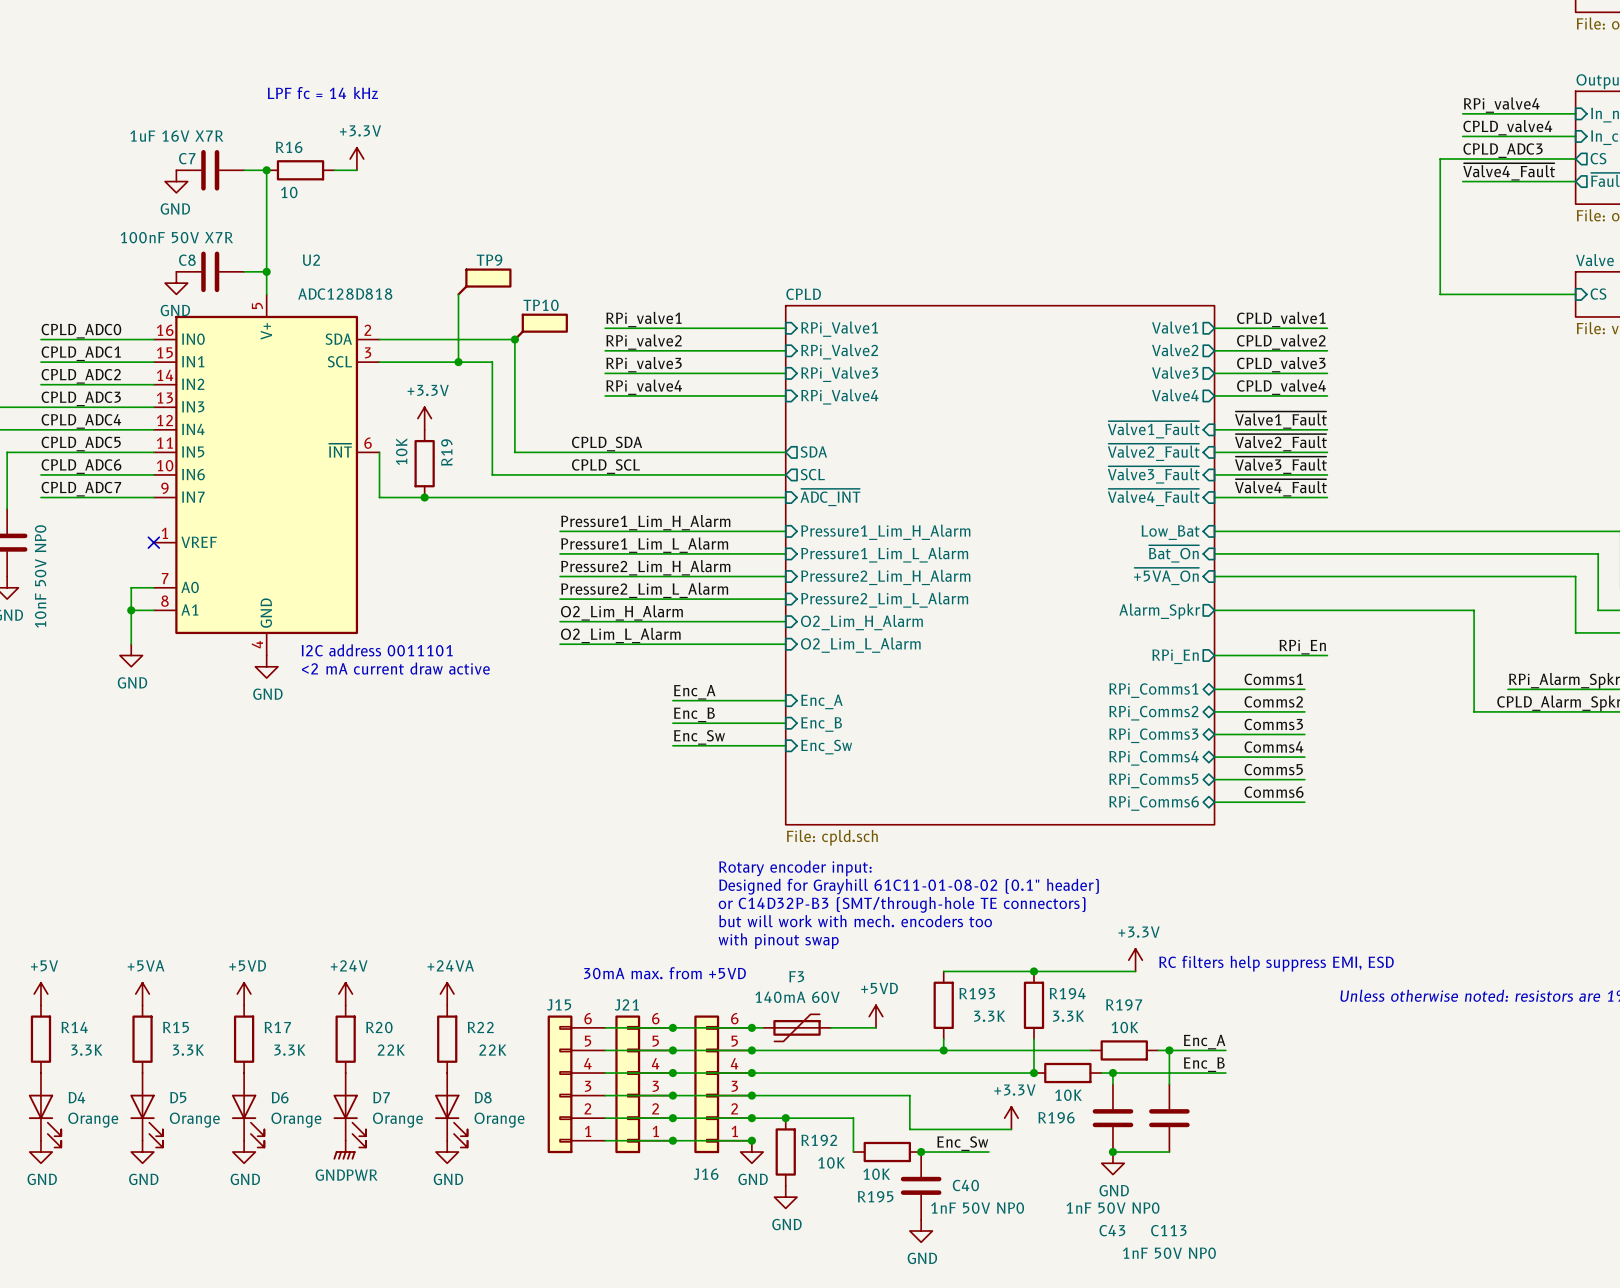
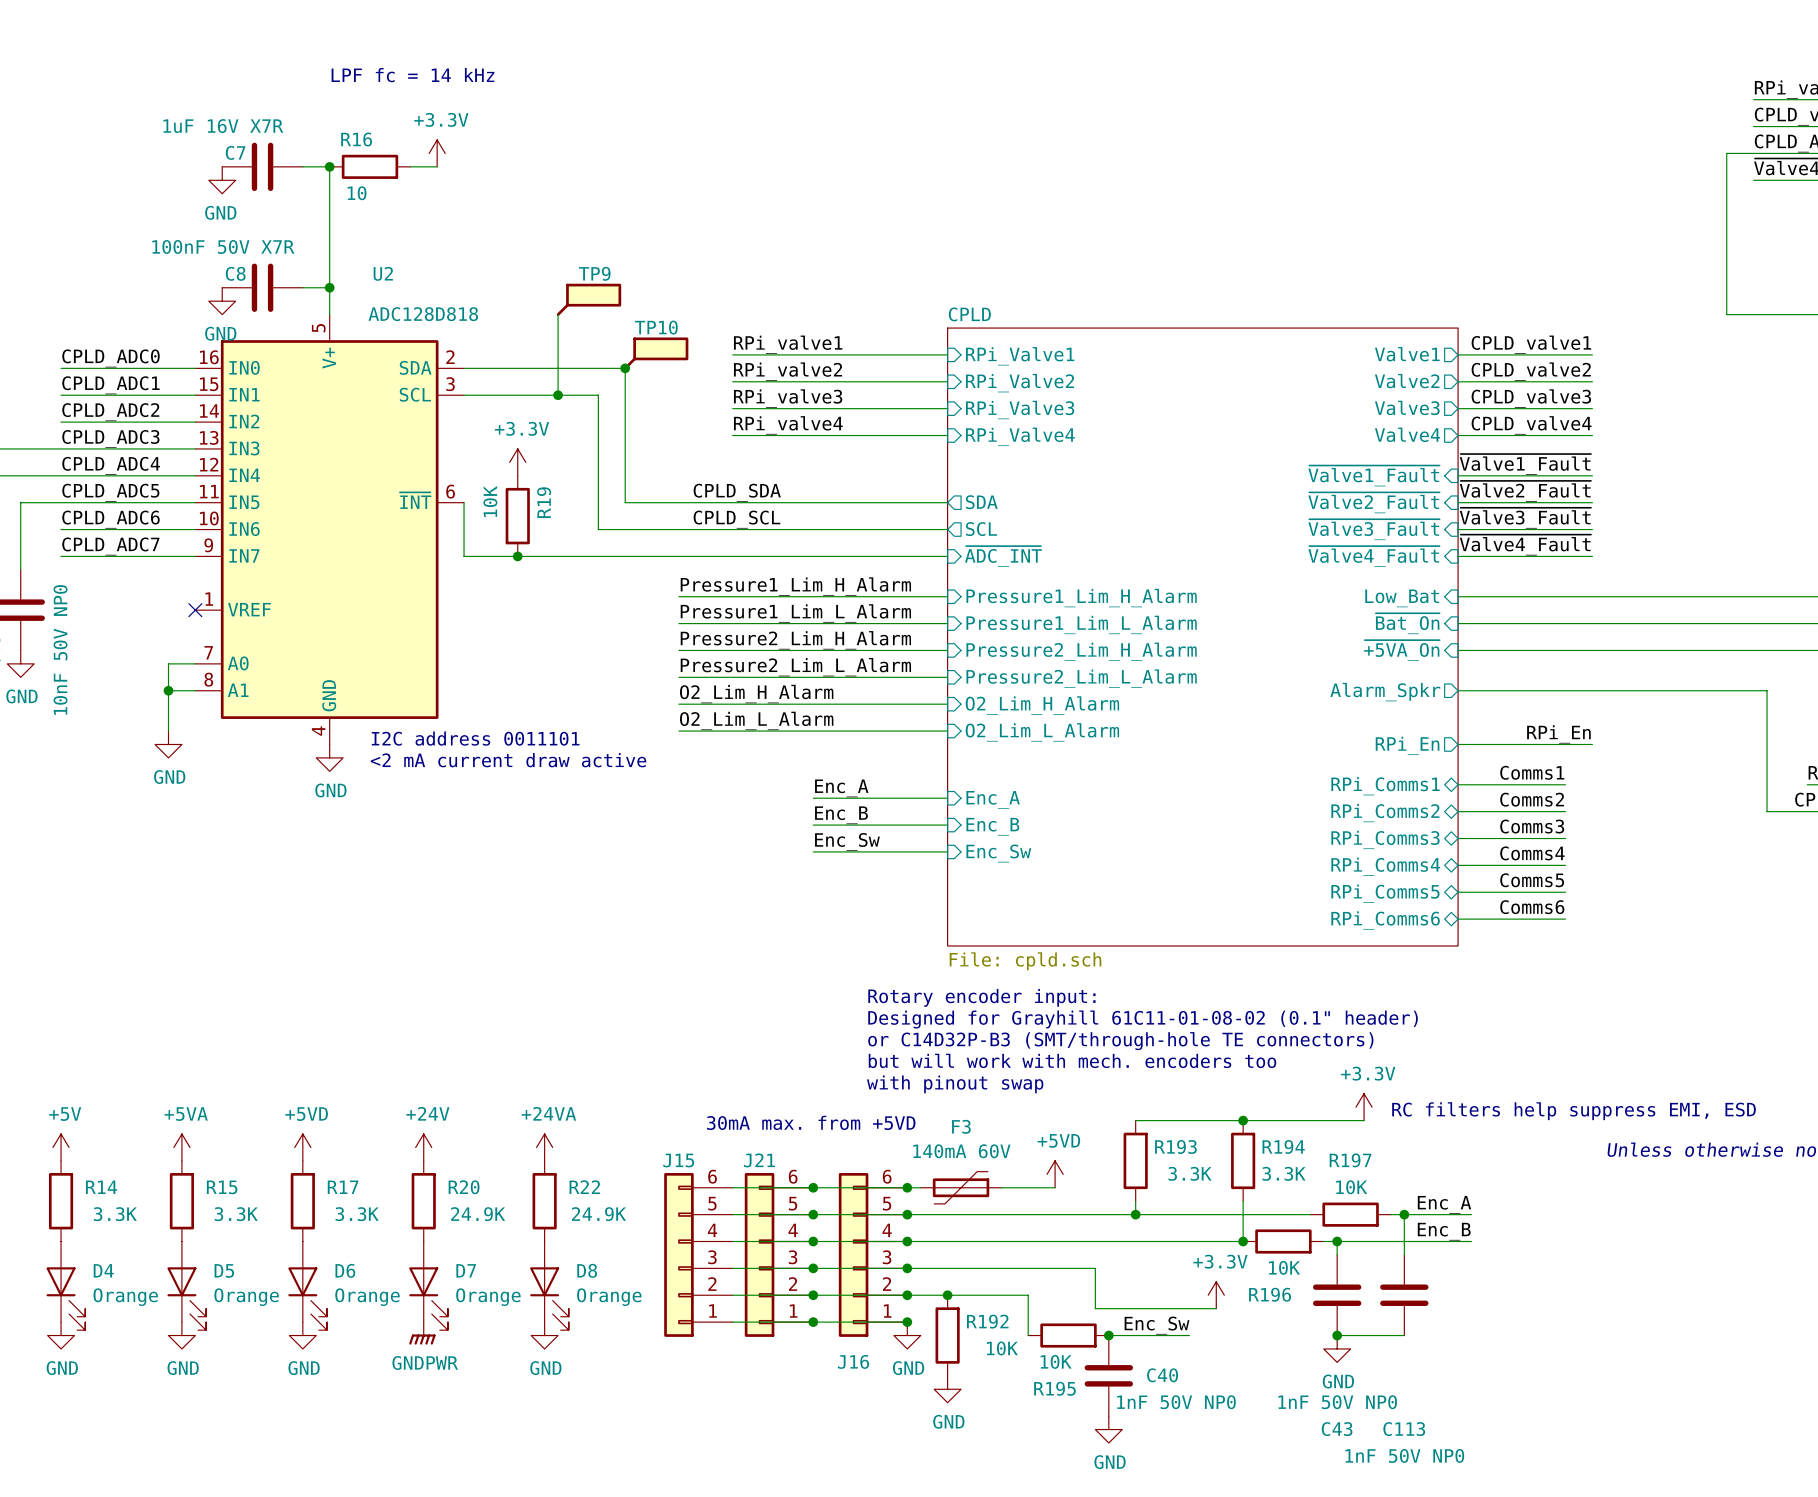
R20 value: 22K (391, 1050) -> 24.9K (478, 1214)
R22 value: 22K (492, 1050) -> 24.9K (599, 1214)

